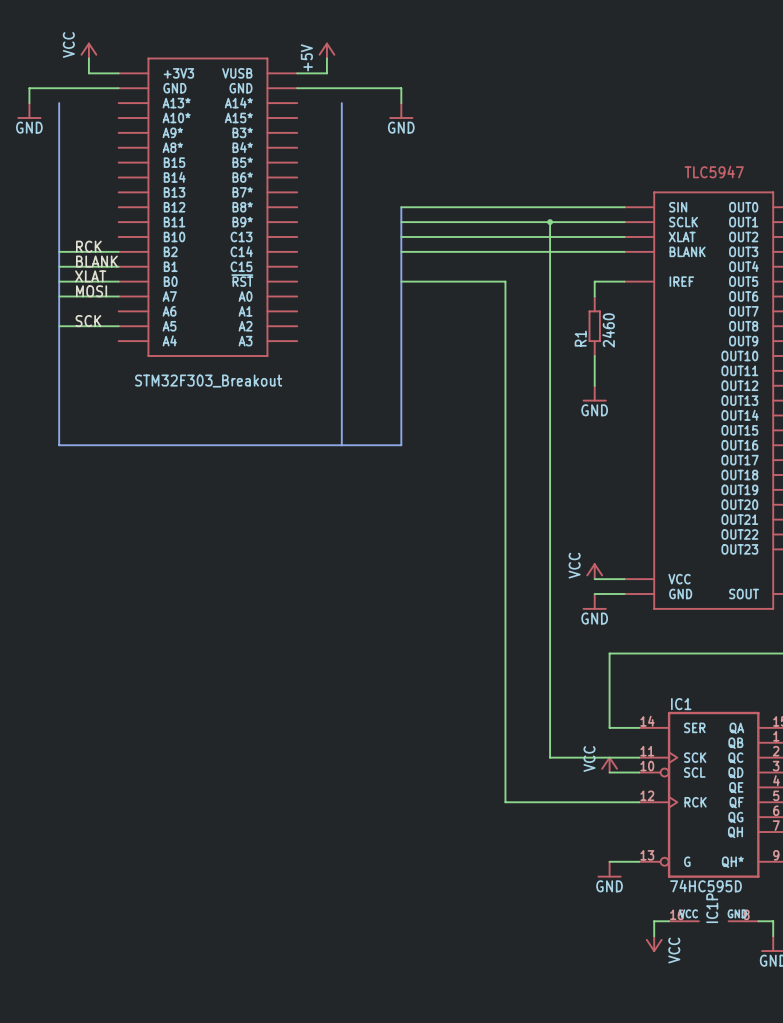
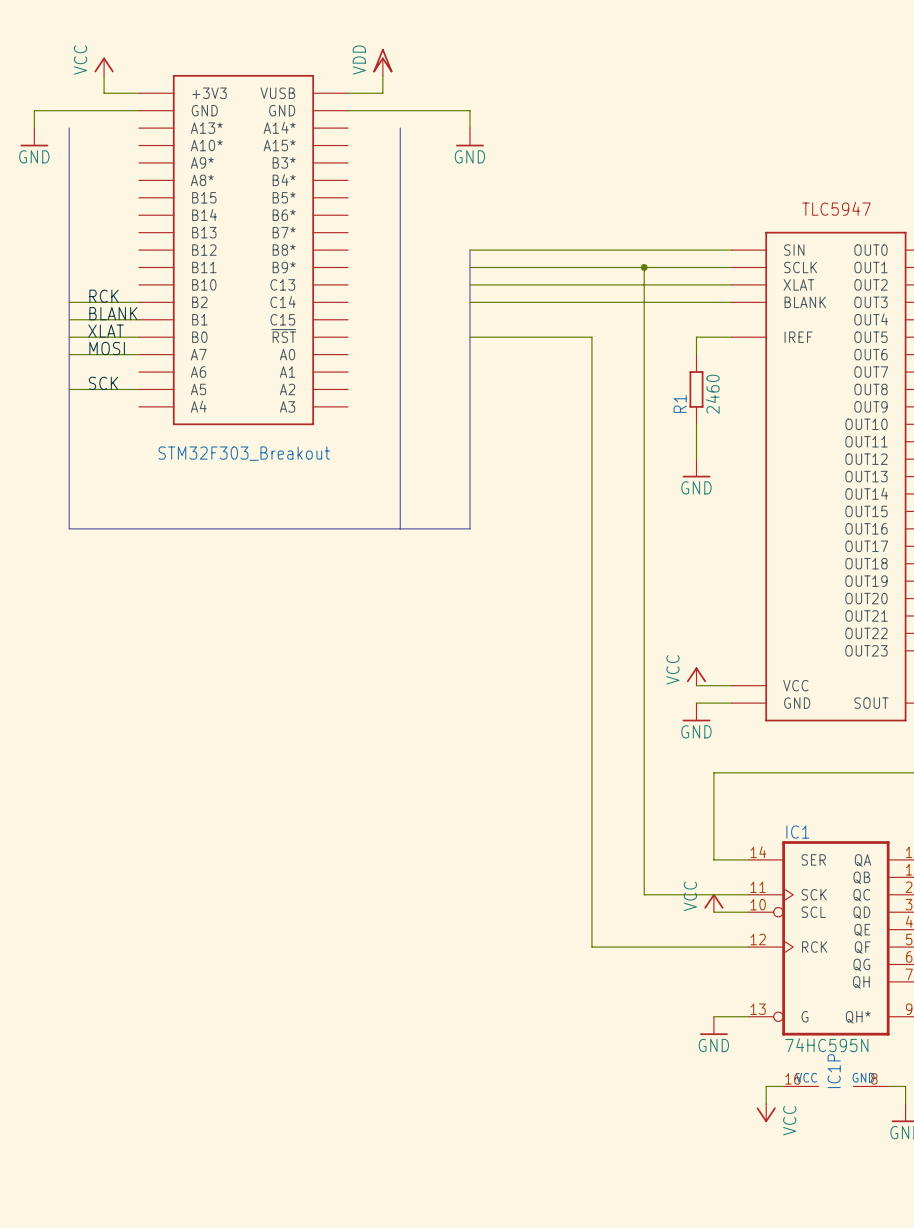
power symbol: +5V (326, 50) -> VDD (382, 62)
IC1 value: 74HC595D (706, 886) -> 74HC595N (826, 1045)

